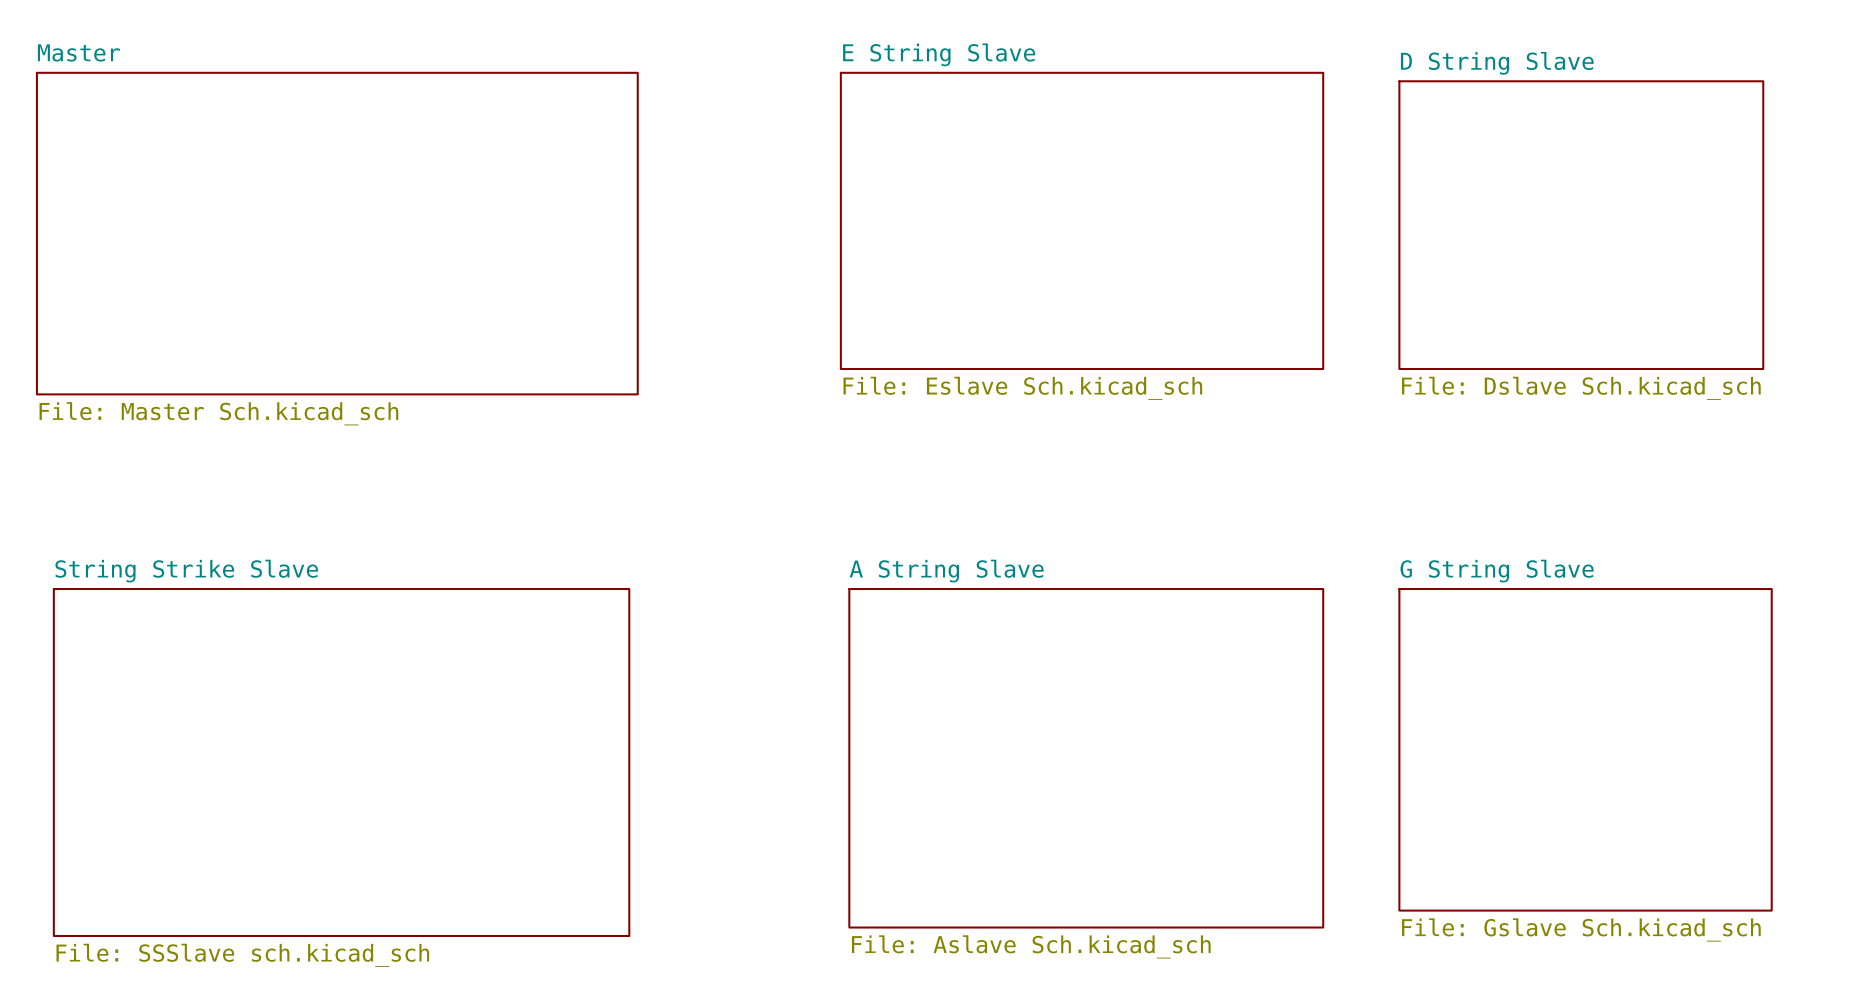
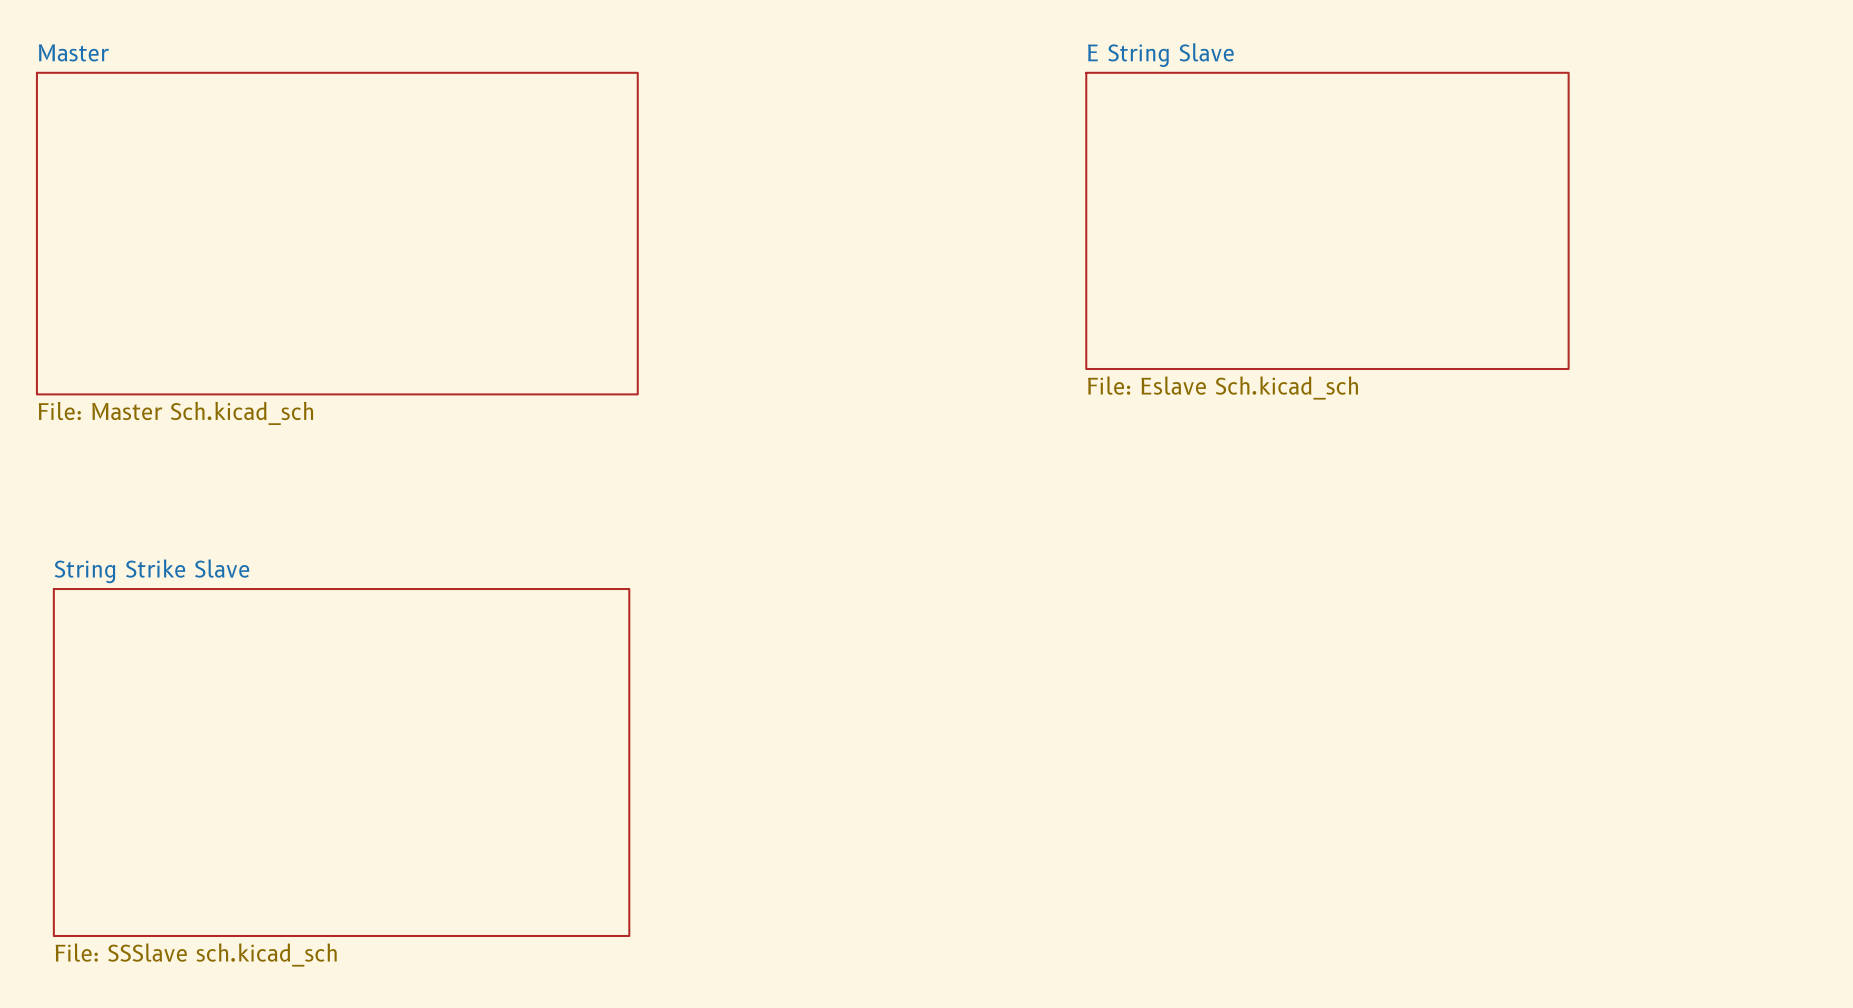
sheet E String Slave position: (1082, 220) -> (1327, 220)
sheet D String Slave: File: Dslave Sch.kicad_sch (1581, 225) -> none
sheet G String Slave: File: Gslave Sch.kicad_sch (1585, 749) -> none
sheet A String Slave: File: Aslave Sch.kicad_sch (1086, 758) -> none

